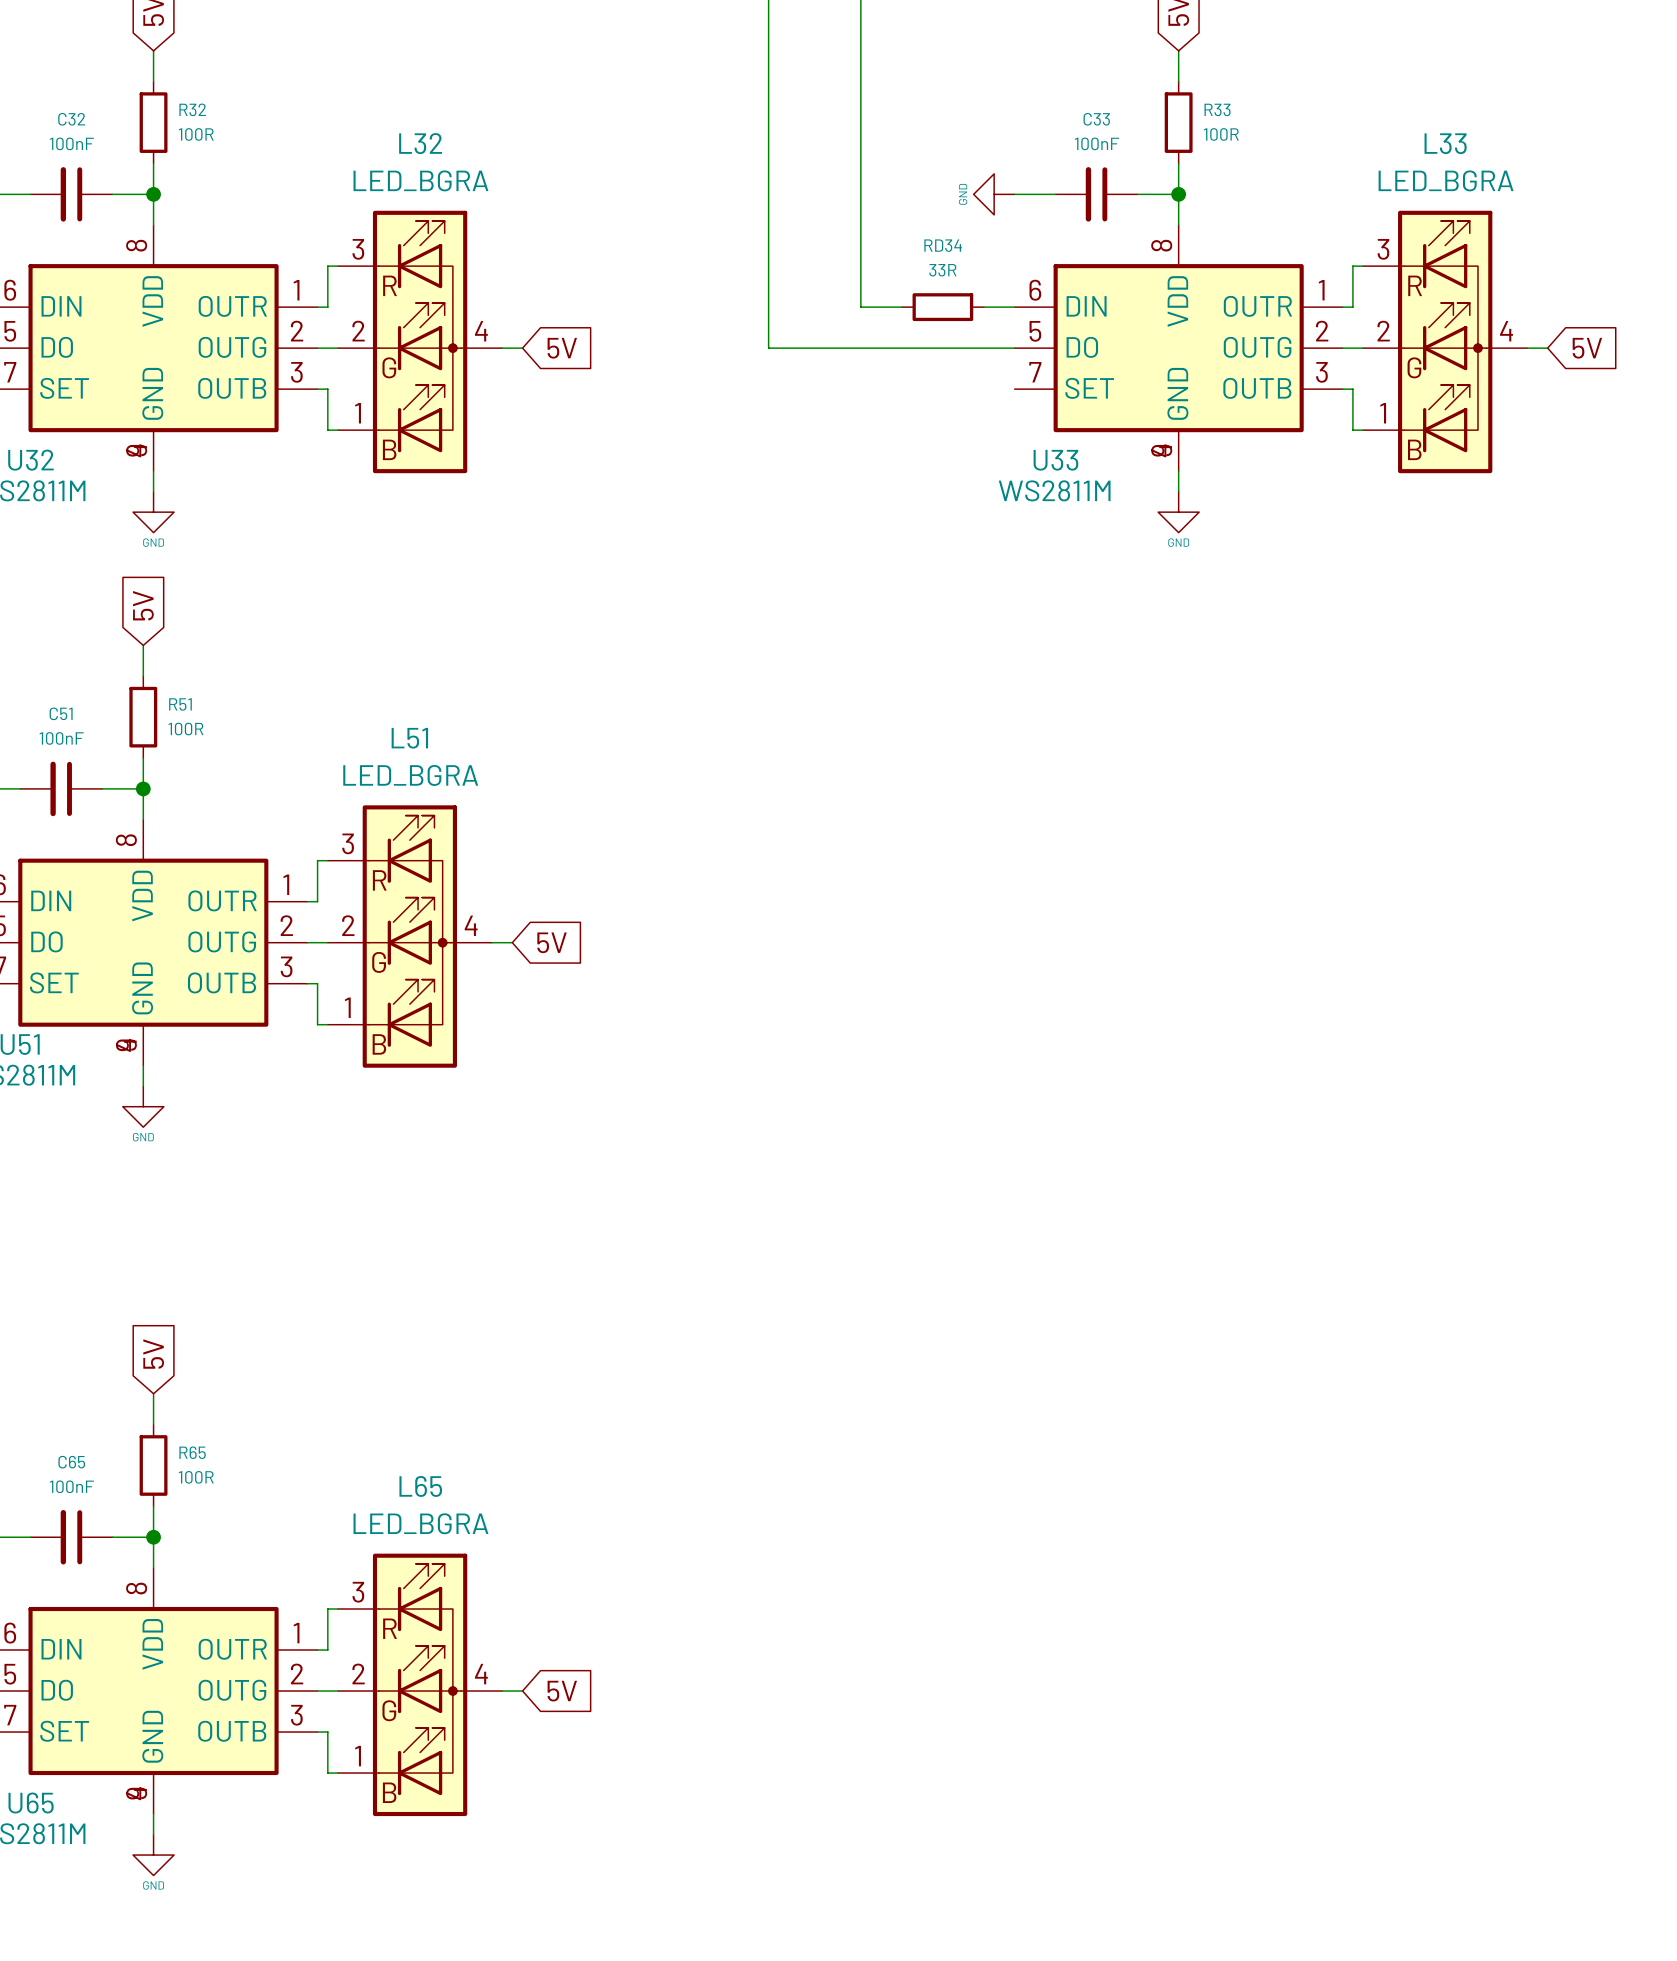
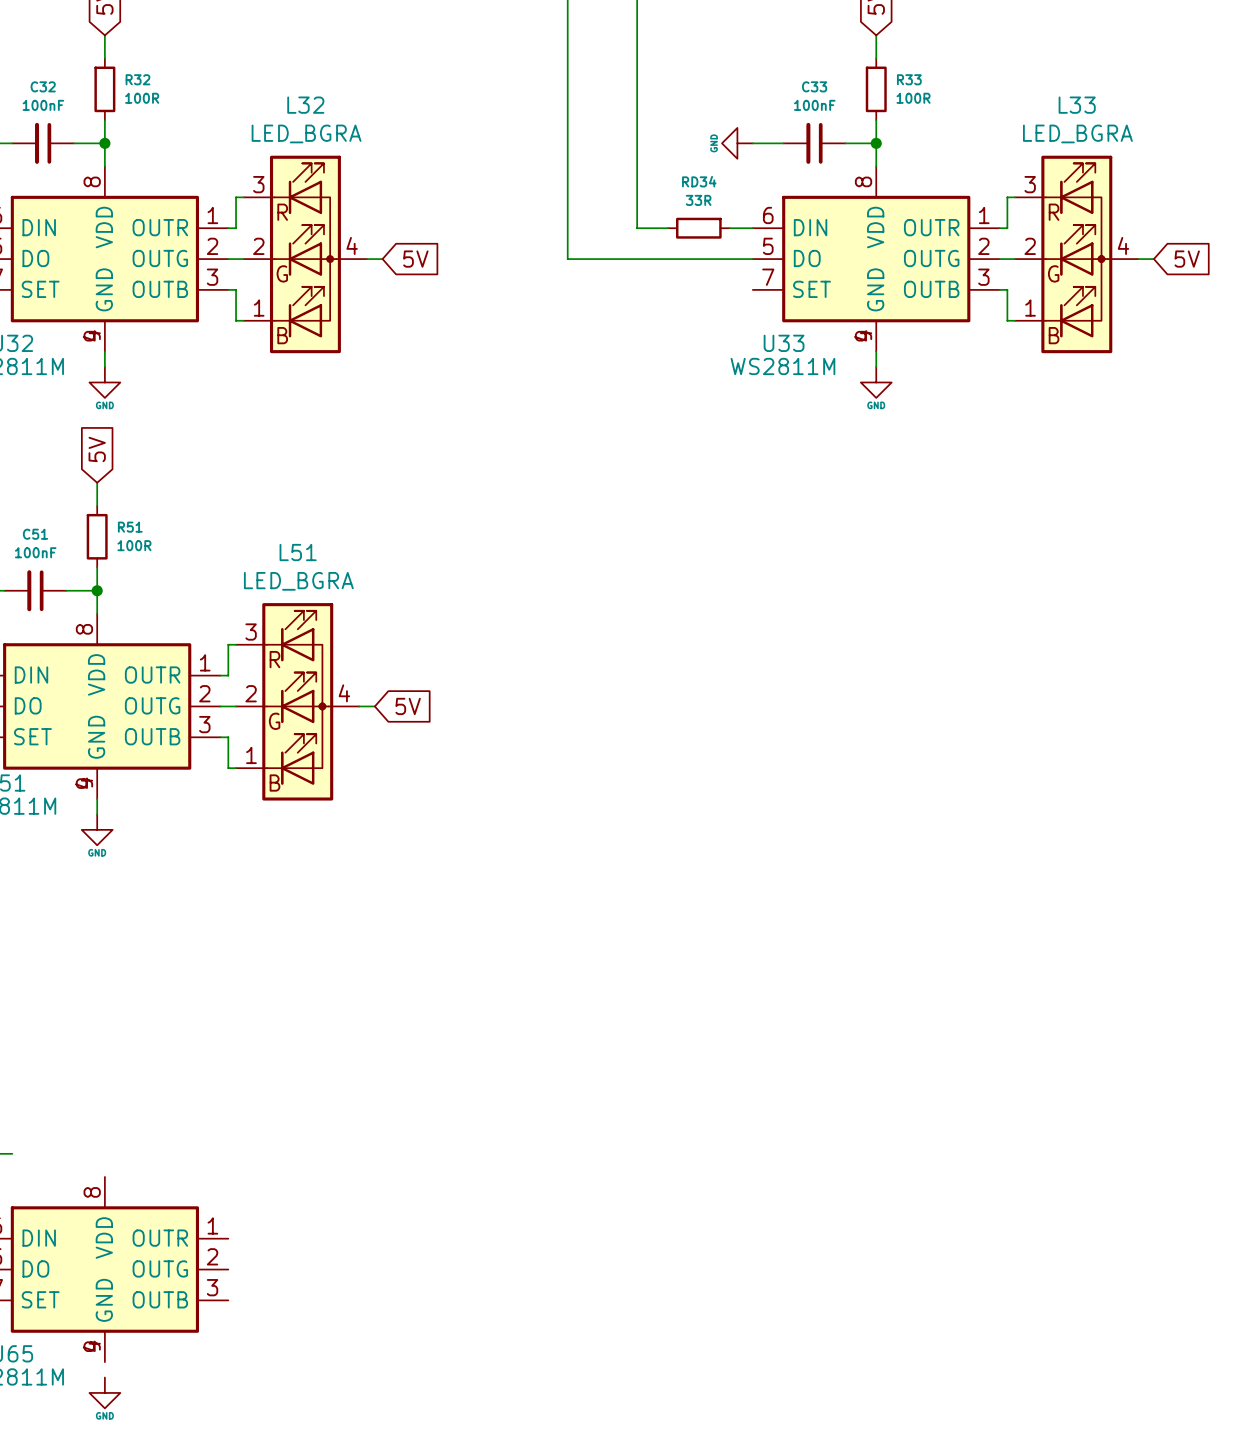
global label: 5V (153, 1354) -> none
wire: (153, 1393) (153, 1424) -> none
R65: 100R (153, 1465) -> none
wire: (153, 1506) (153, 1568) -> none
C65: 100nF (71, 1537) -> none
wire: (112, 1537) (153, 1537) -> none
junction: (153, 1537) -> none
wire: (338, 1609) (327, 1609) (327, 1650) (317, 1650) -> none
L65: LED_BGRA (420, 1684) -> none
wire: (317, 1691) (338, 1691) -> none
wire: (502, 1691) (522, 1691) -> none
global label: 5V (562, 1691) -> none
wire: (317, 1732) (327, 1732) (327, 1773) (338, 1773) -> none
wire: (153, 1814) (153, 1834) -> none

